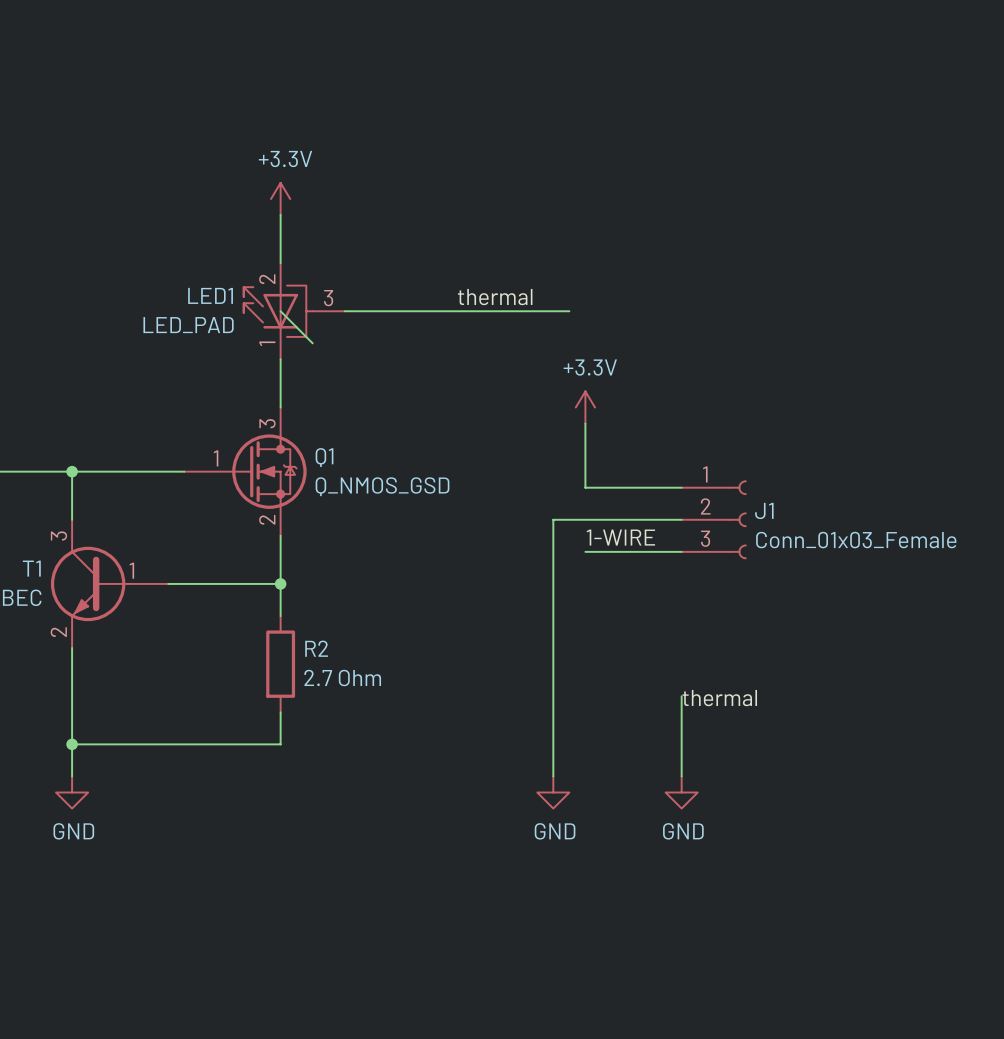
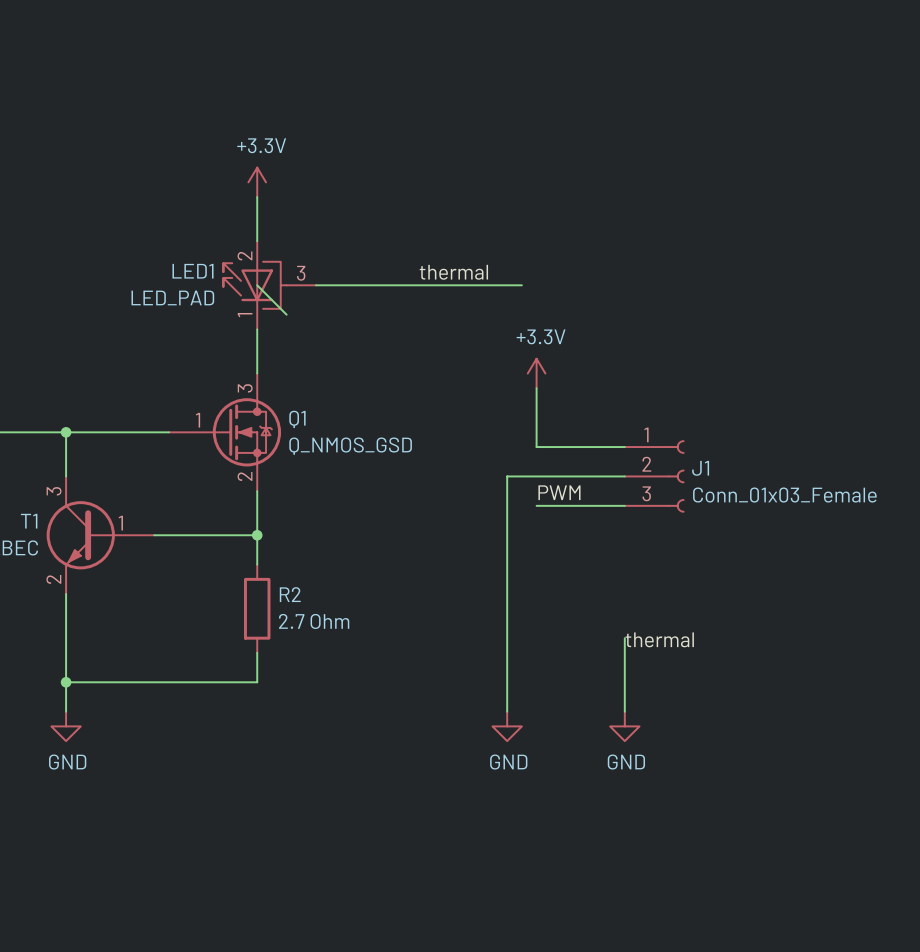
label: 1-WIRE (620, 537) -> PWM (559, 492)

